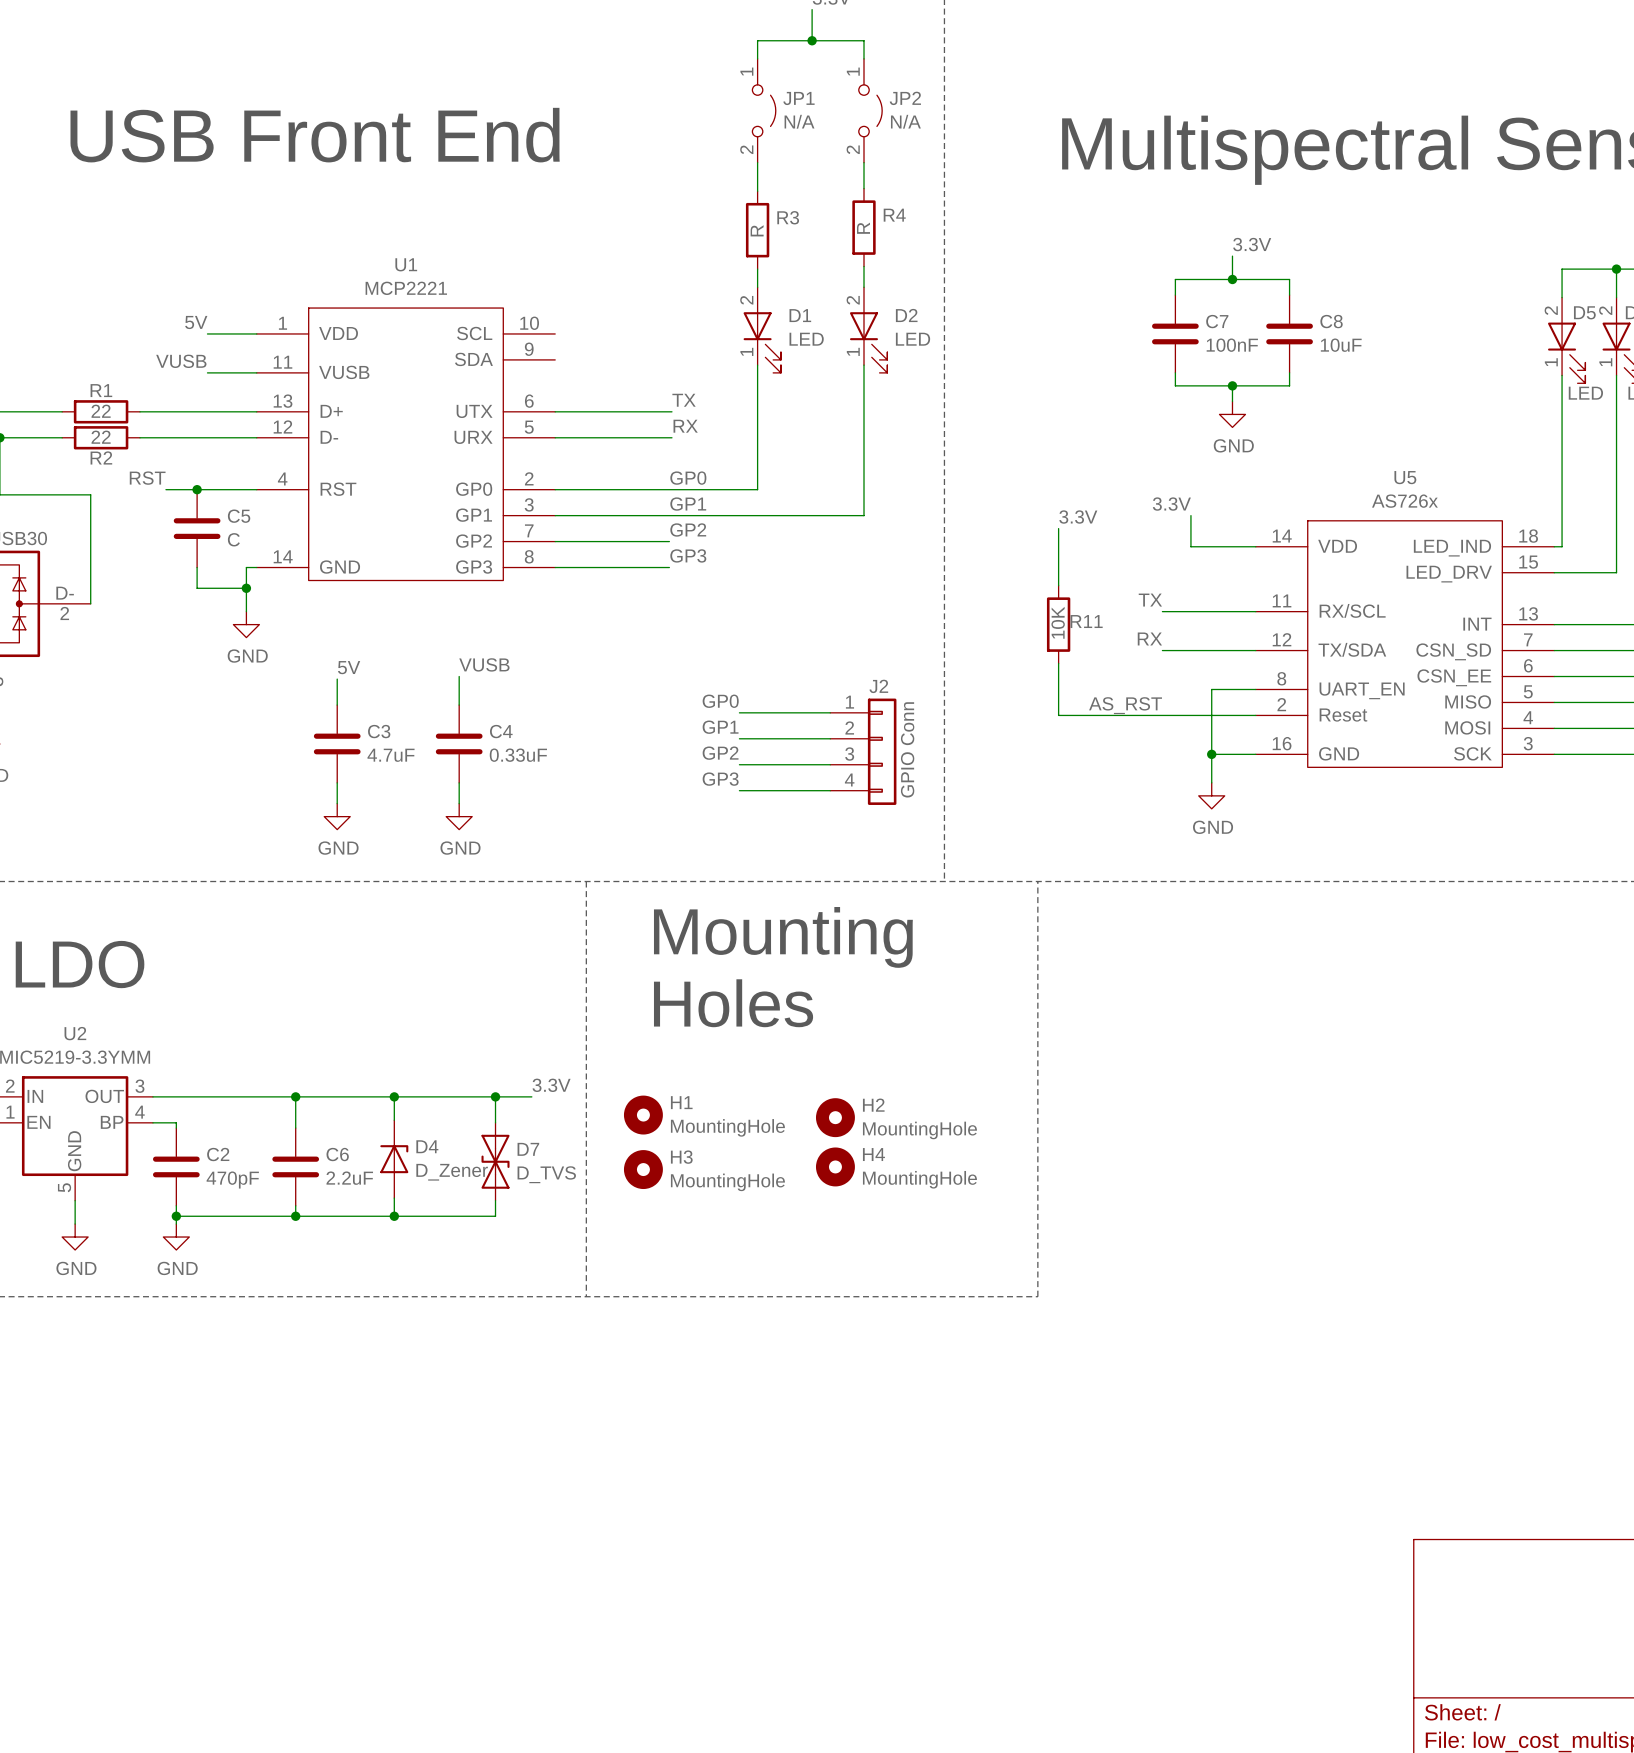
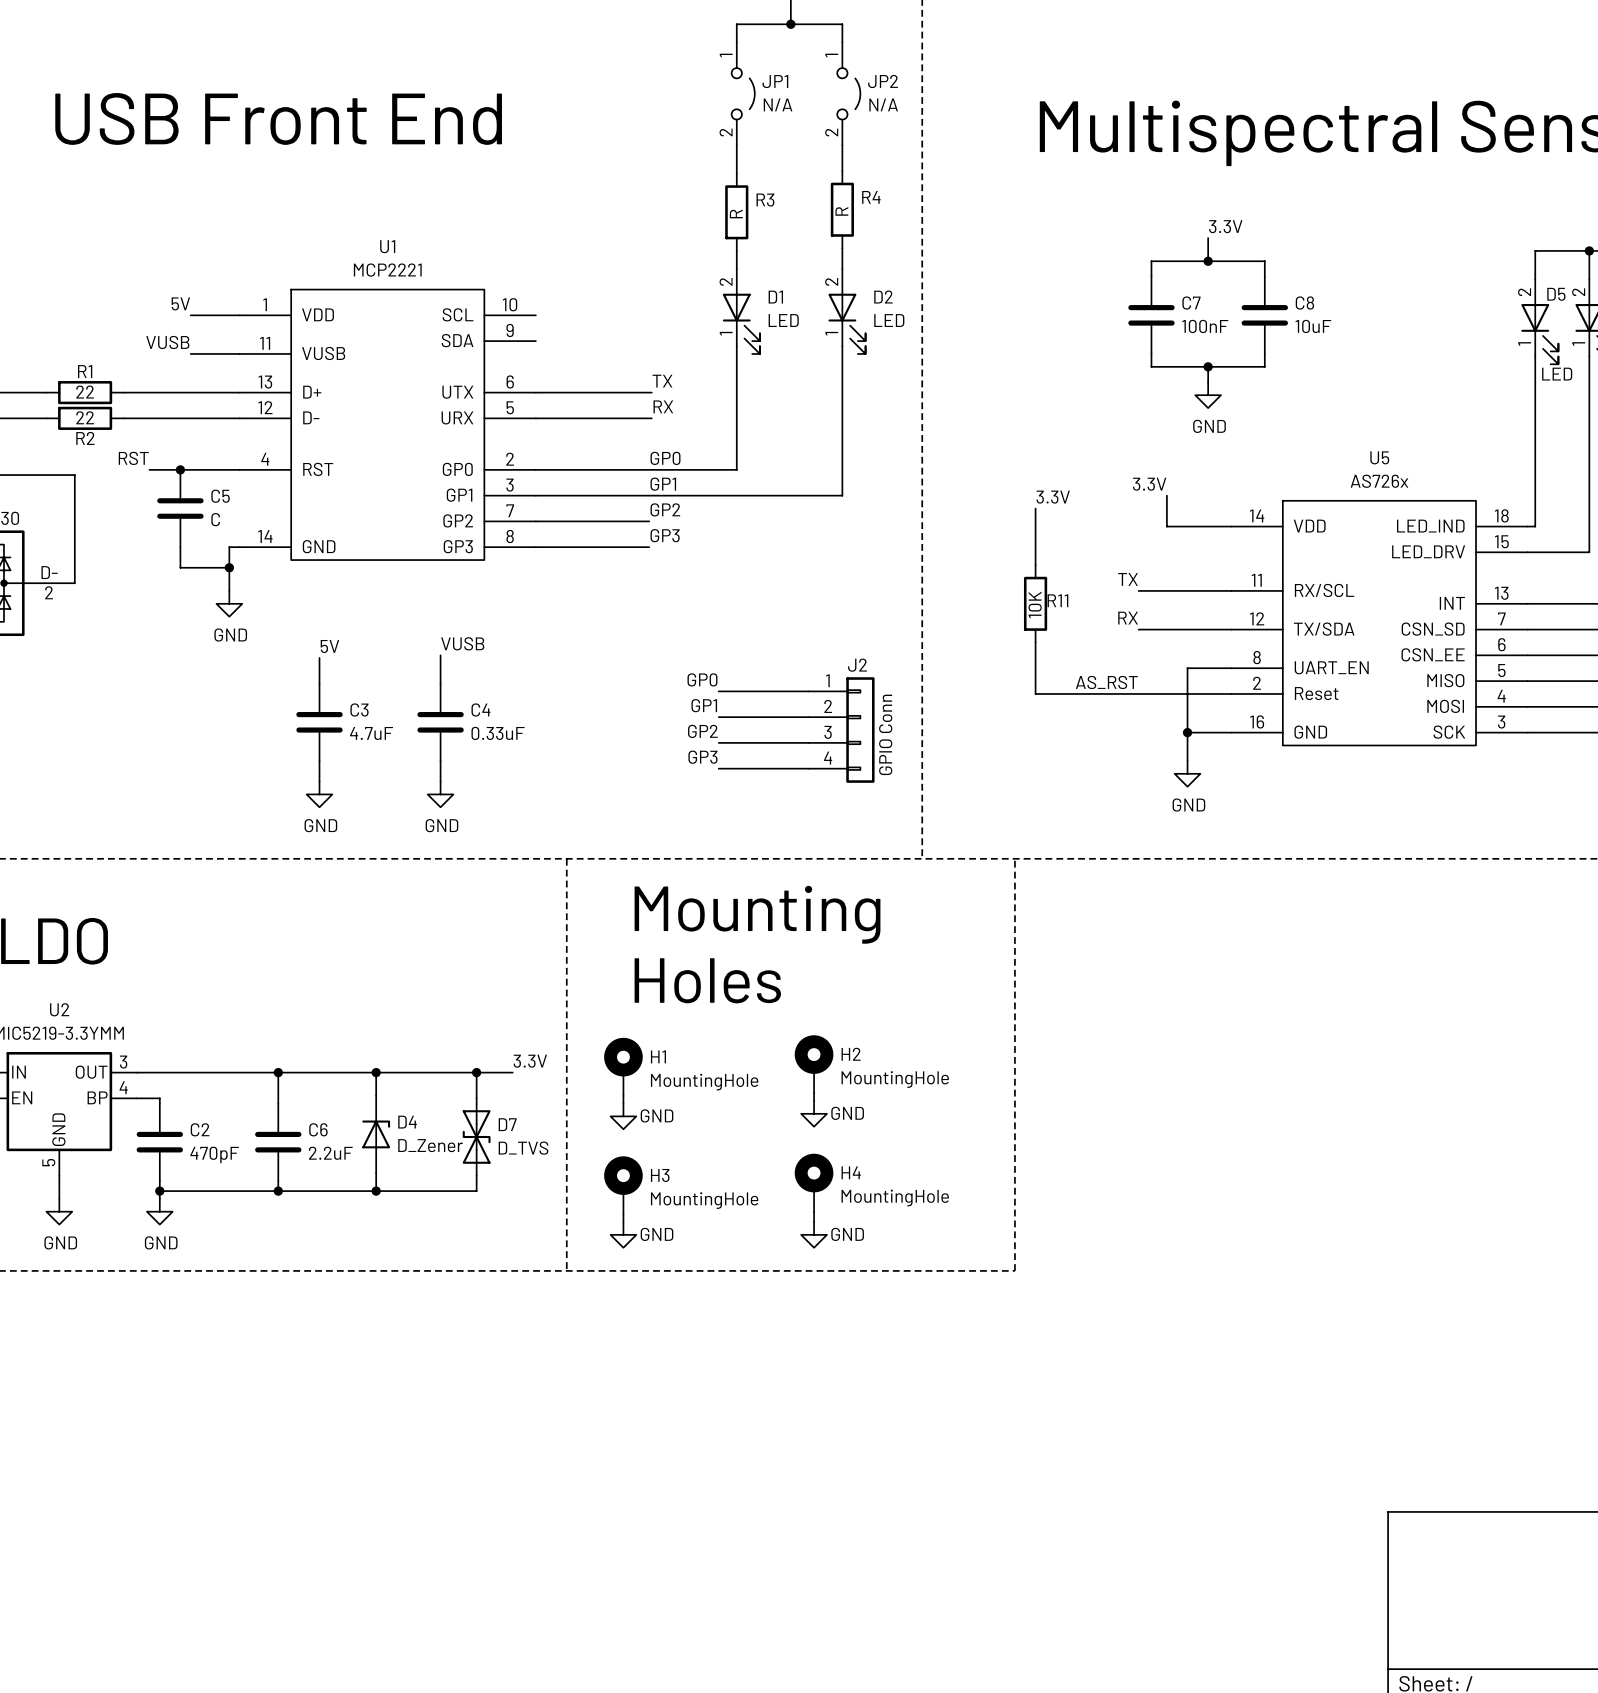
H1 symbol: [623, 1095, 663, 1135] -> [604, 1037, 643, 1096]
H2 symbol: [815, 1098, 855, 1138] -> [794, 1035, 834, 1094]
wire: none -> (814, 1093) (814, 1100)
power symbol: none -> GND (814, 1113)
power symbol: none -> GND (623, 1116)
H4 symbol: [815, 1147, 855, 1187] -> [794, 1153, 834, 1212]
H3 symbol: [623, 1150, 663, 1190] -> [604, 1156, 643, 1215]
wire: none -> (814, 1211) (814, 1222)
wire: none -> (623, 1214) (623, 1222)
power symbol: none -> GND (623, 1234)
power symbol: none -> GND (814, 1234)

